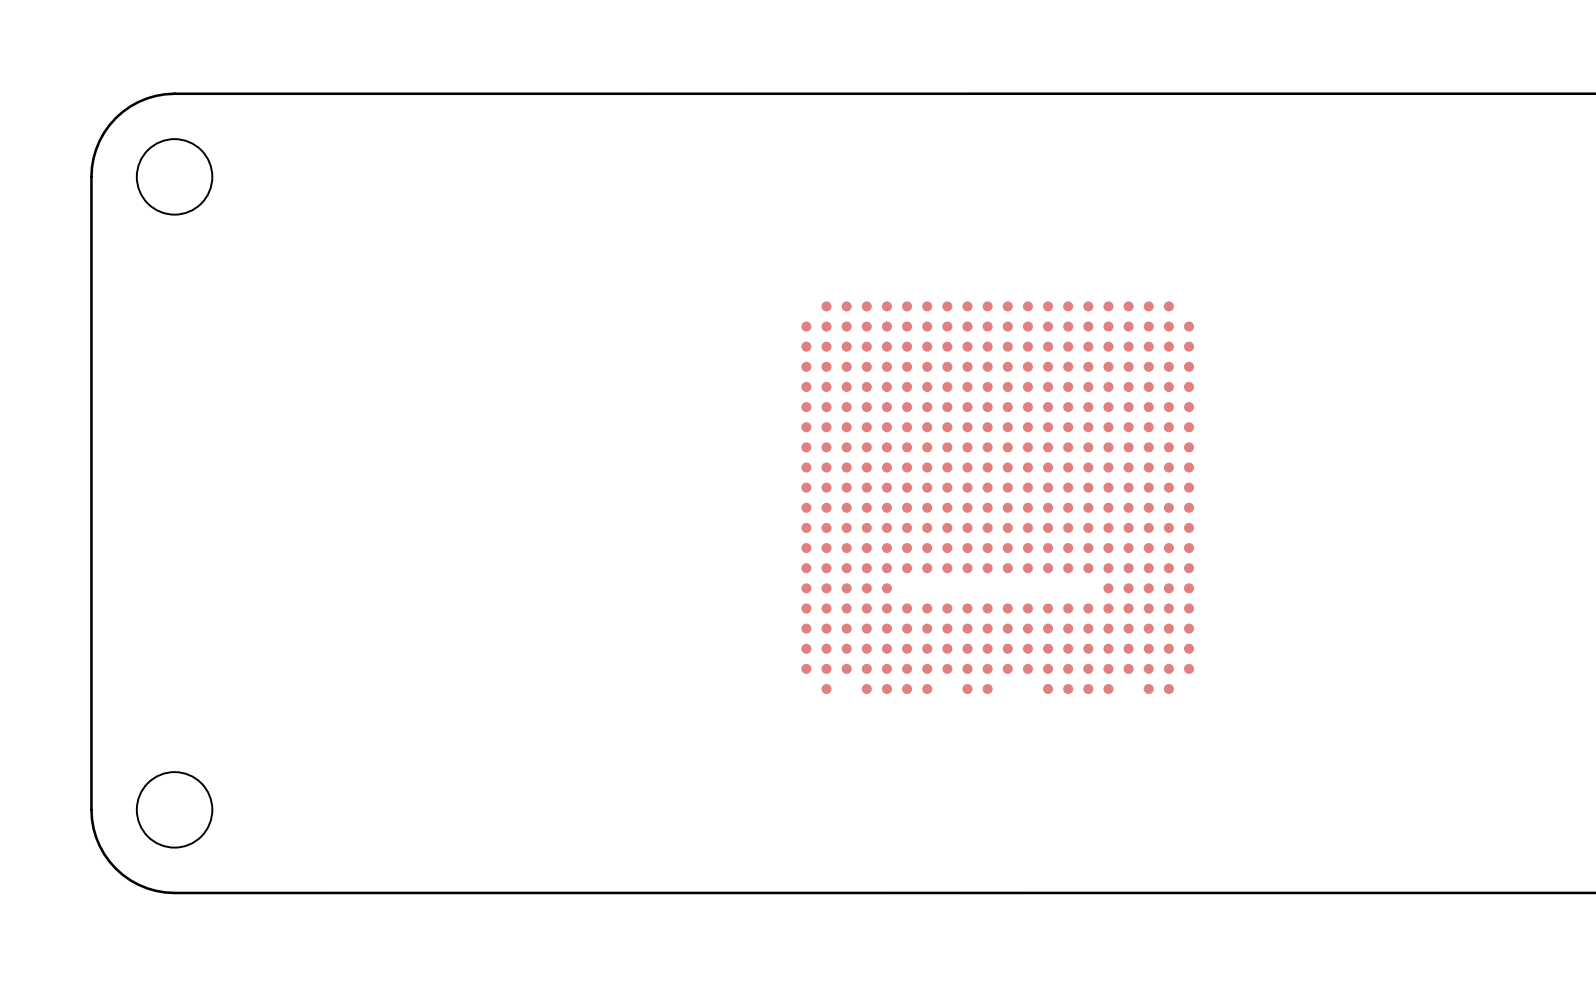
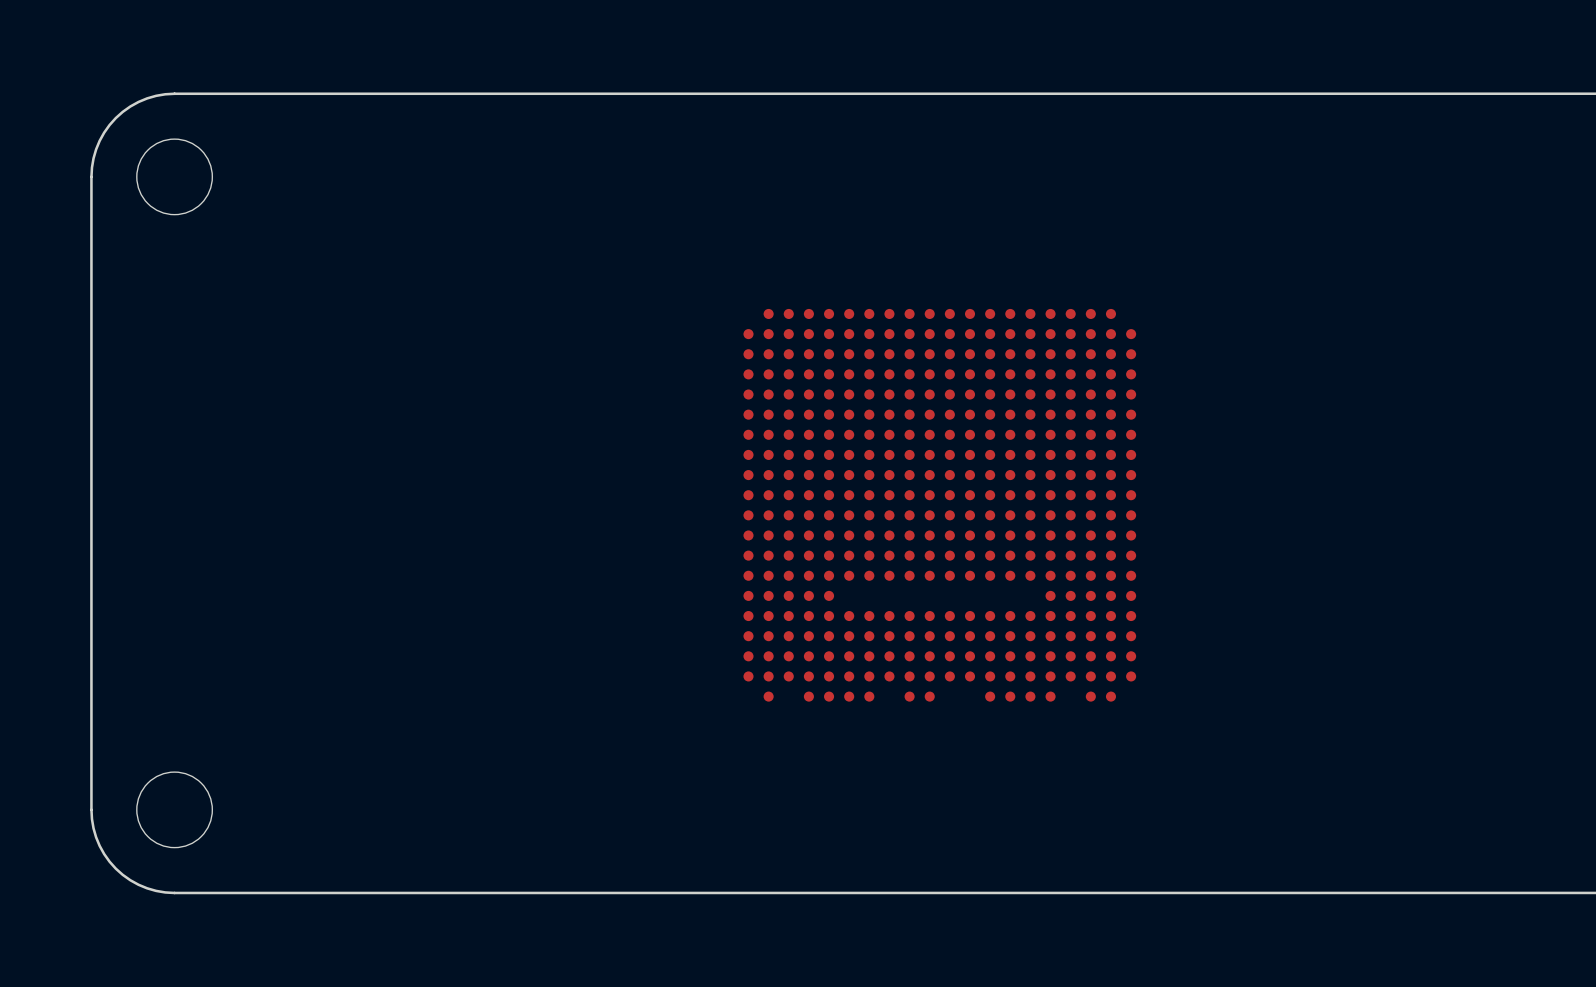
part position: (997, 497) -> (939, 505)

